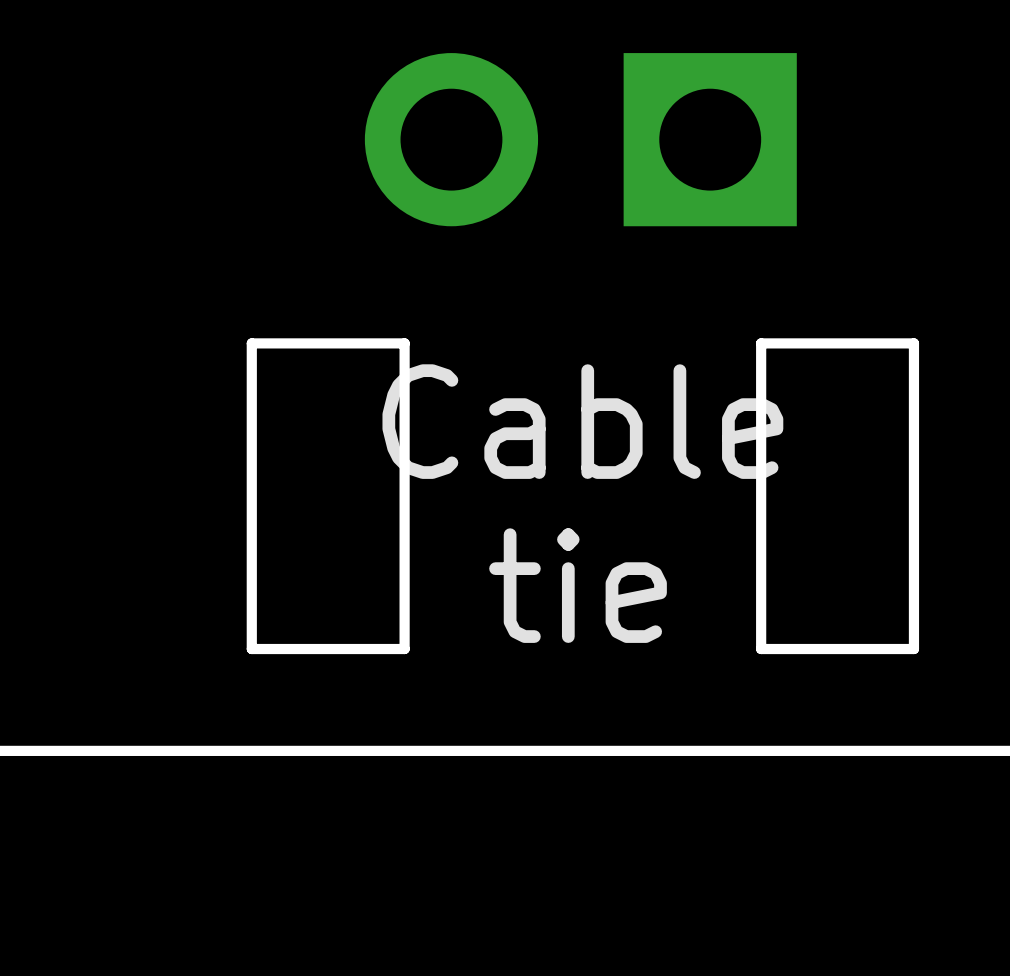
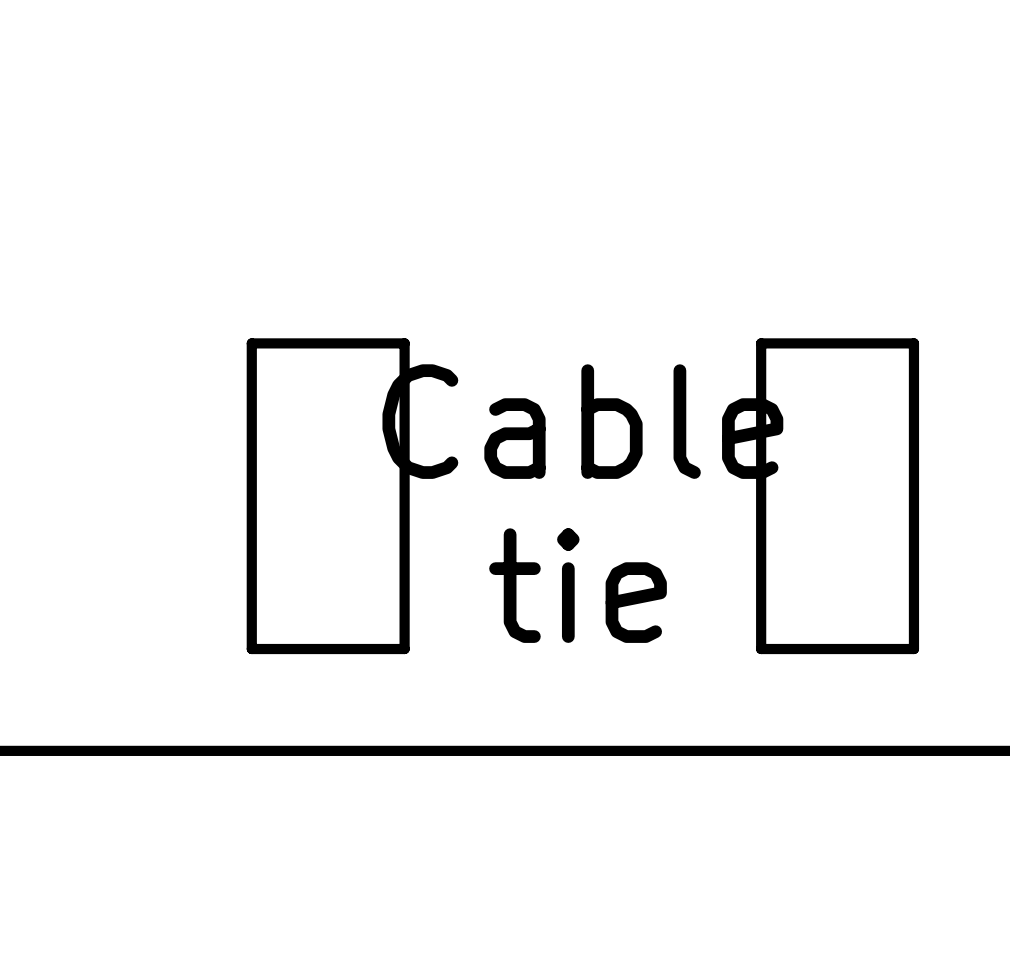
part: (580, 139) -> none

